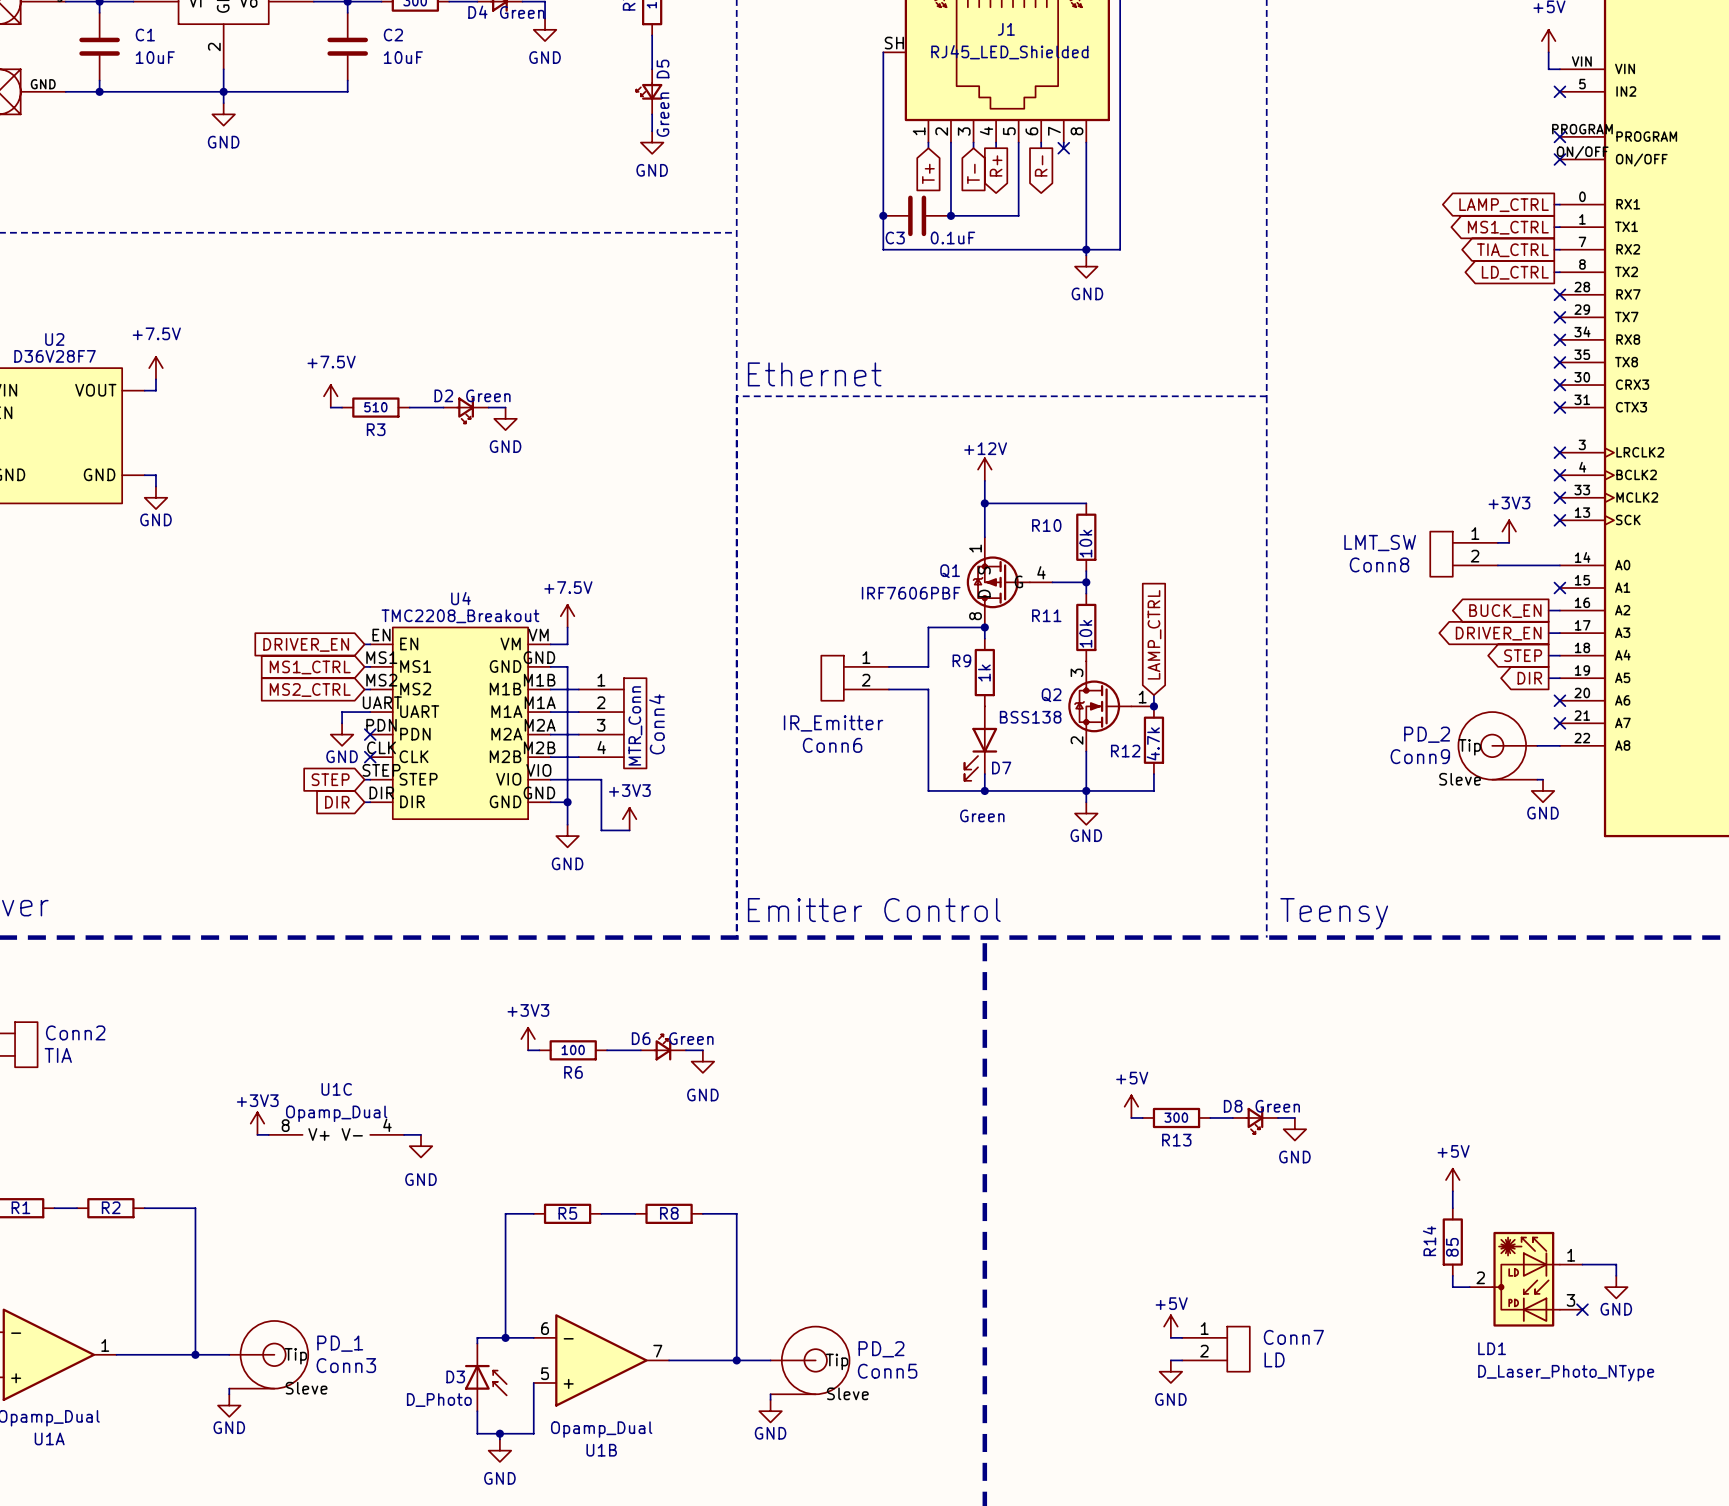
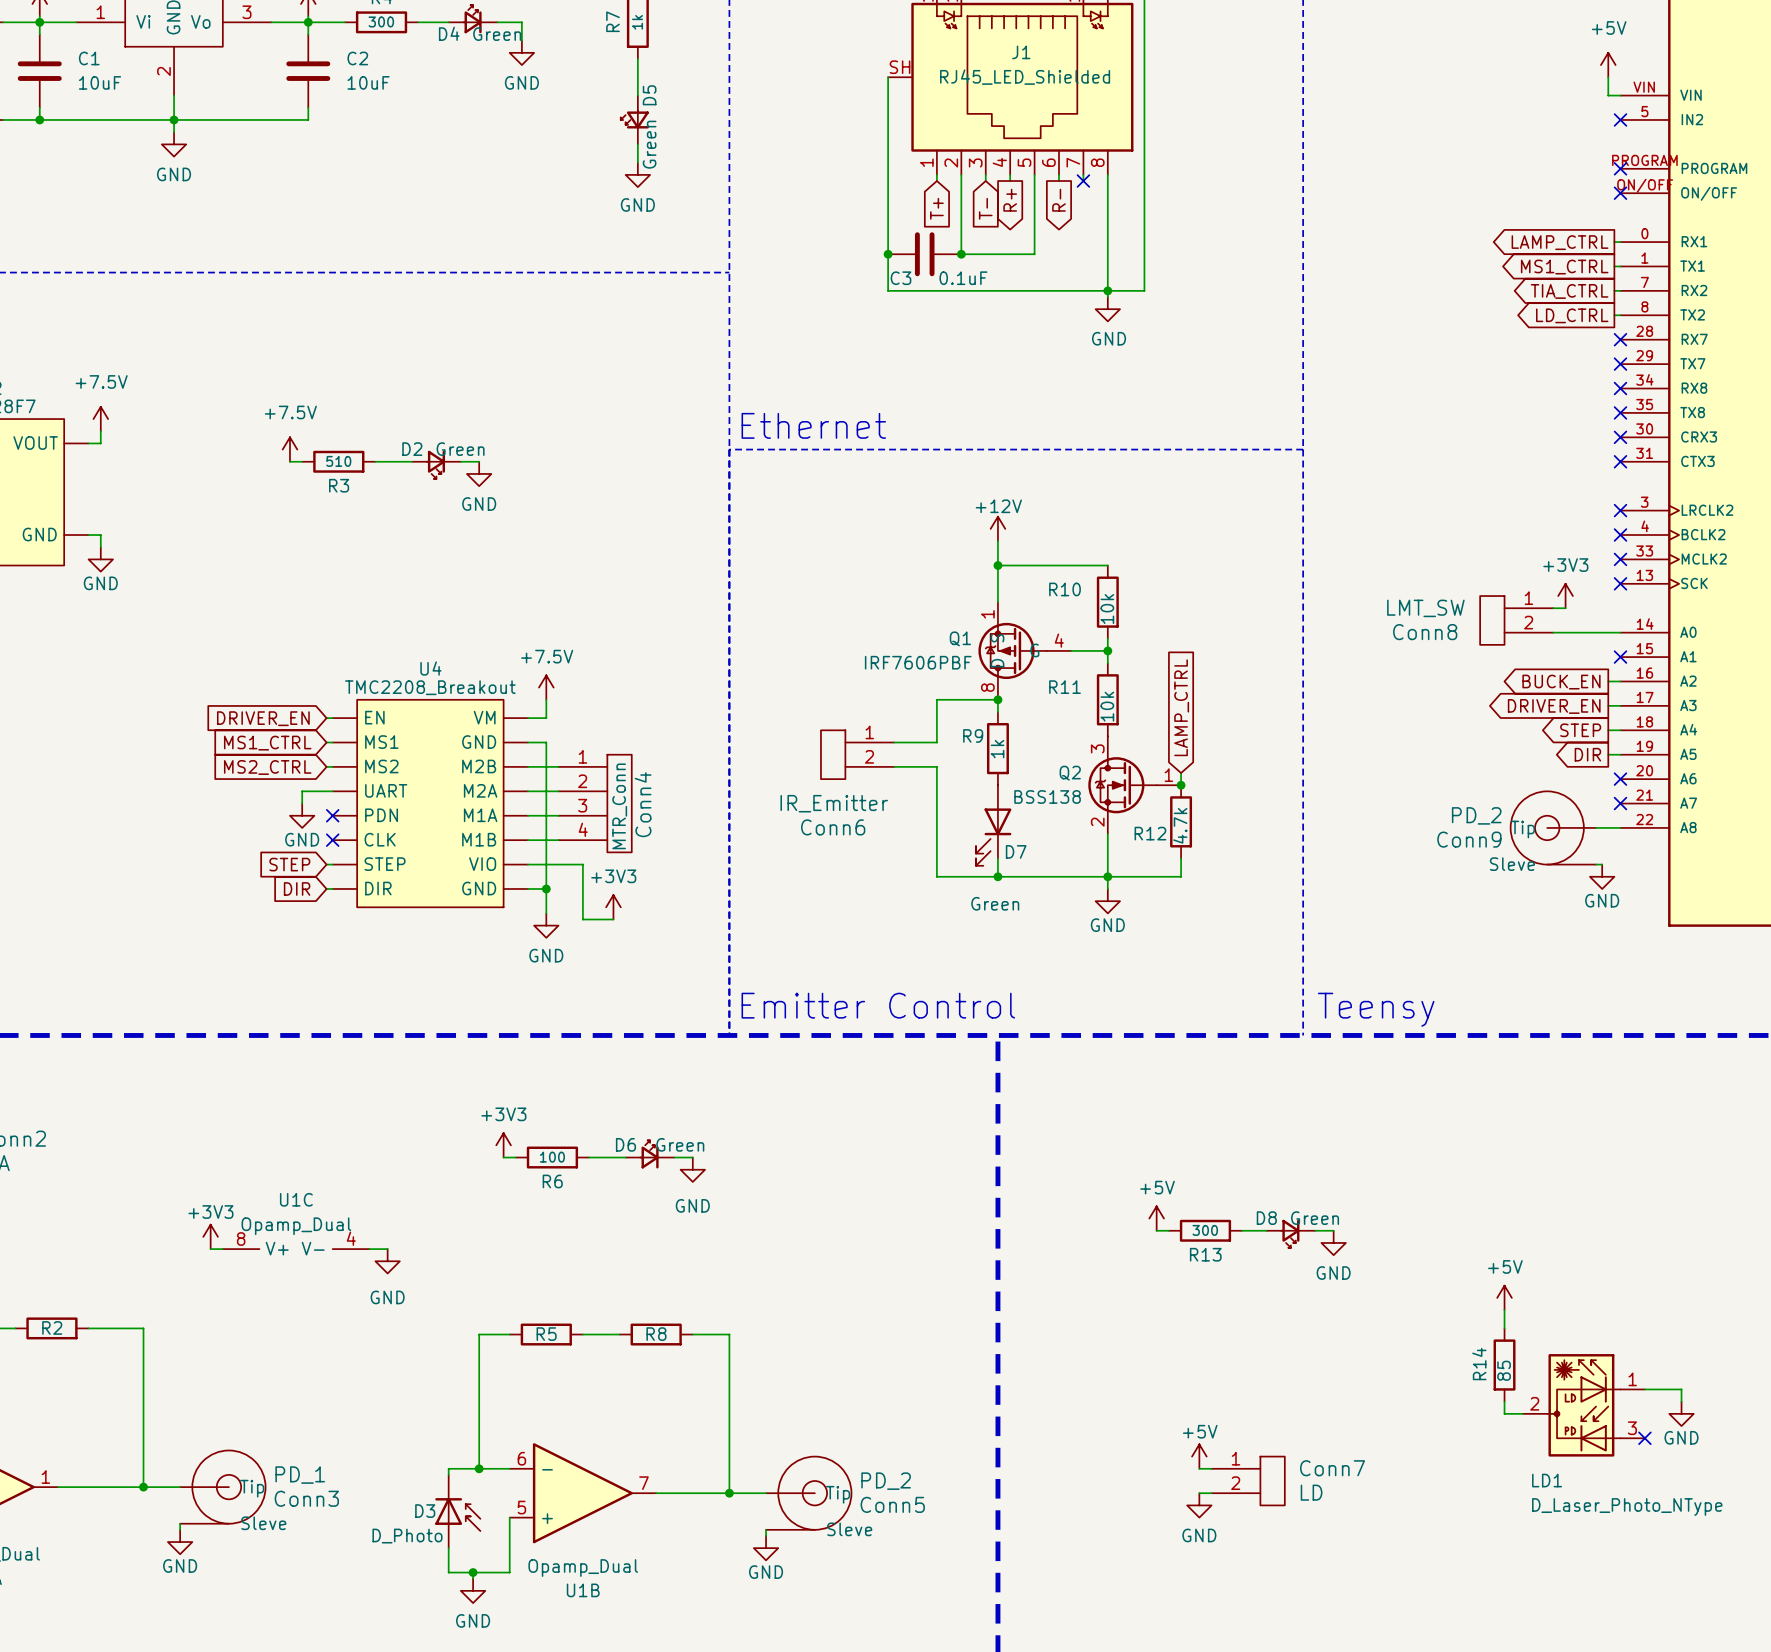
U4 symbol: [370, 627, 551, 820] -> [332, 699, 529, 908]

